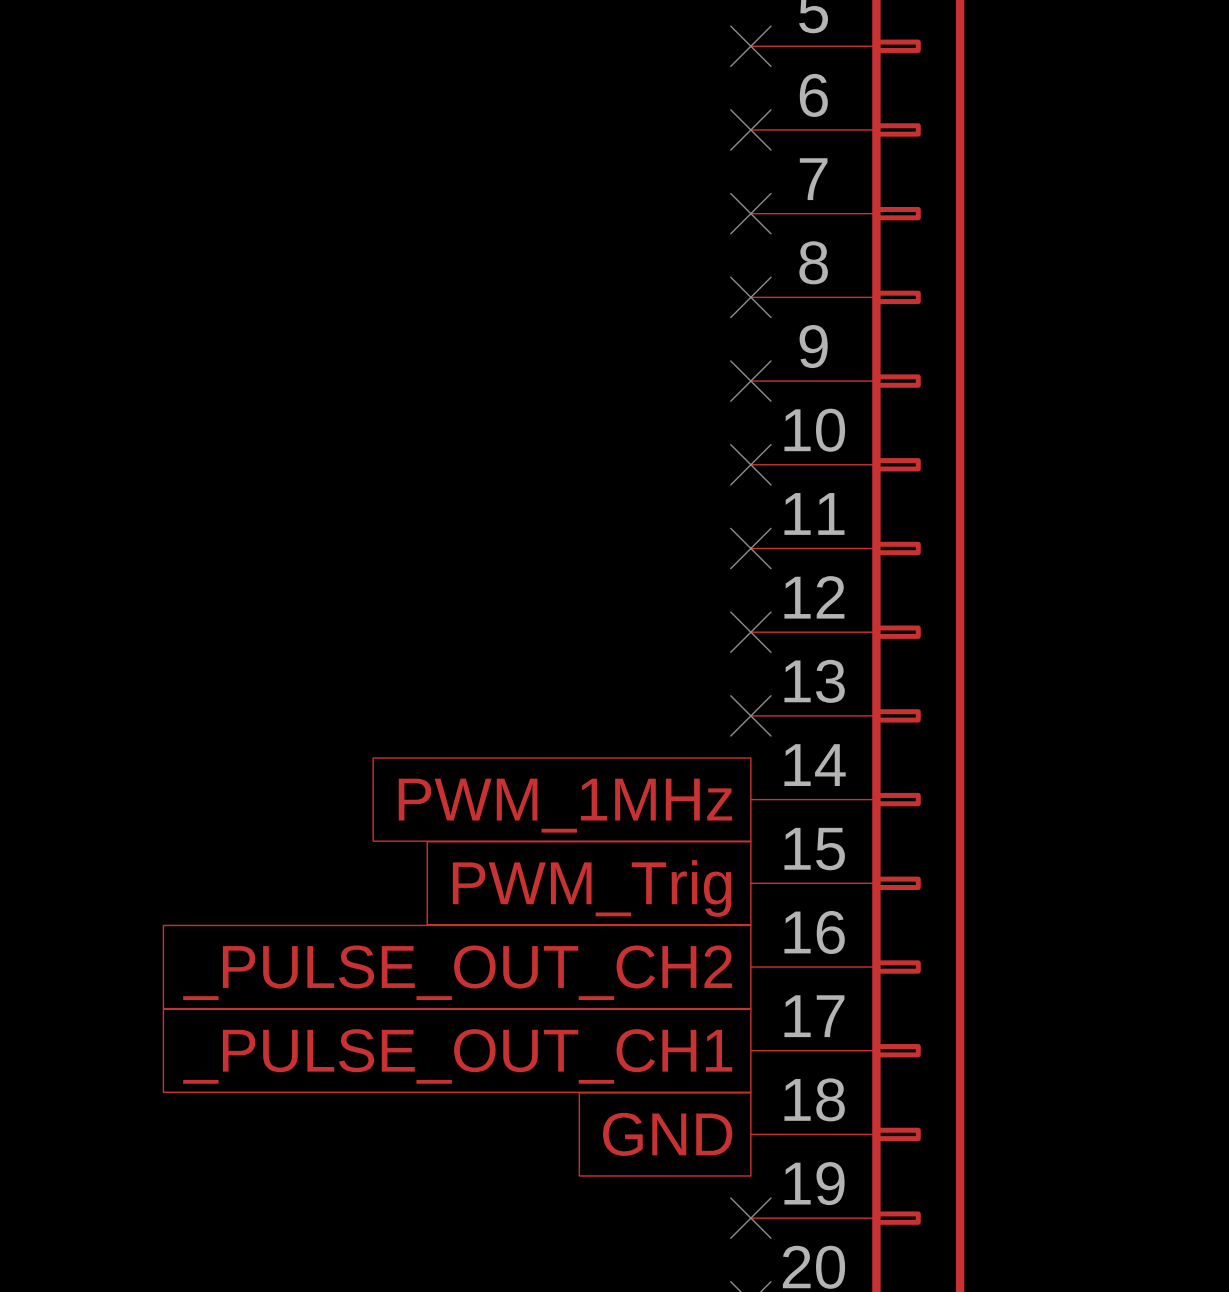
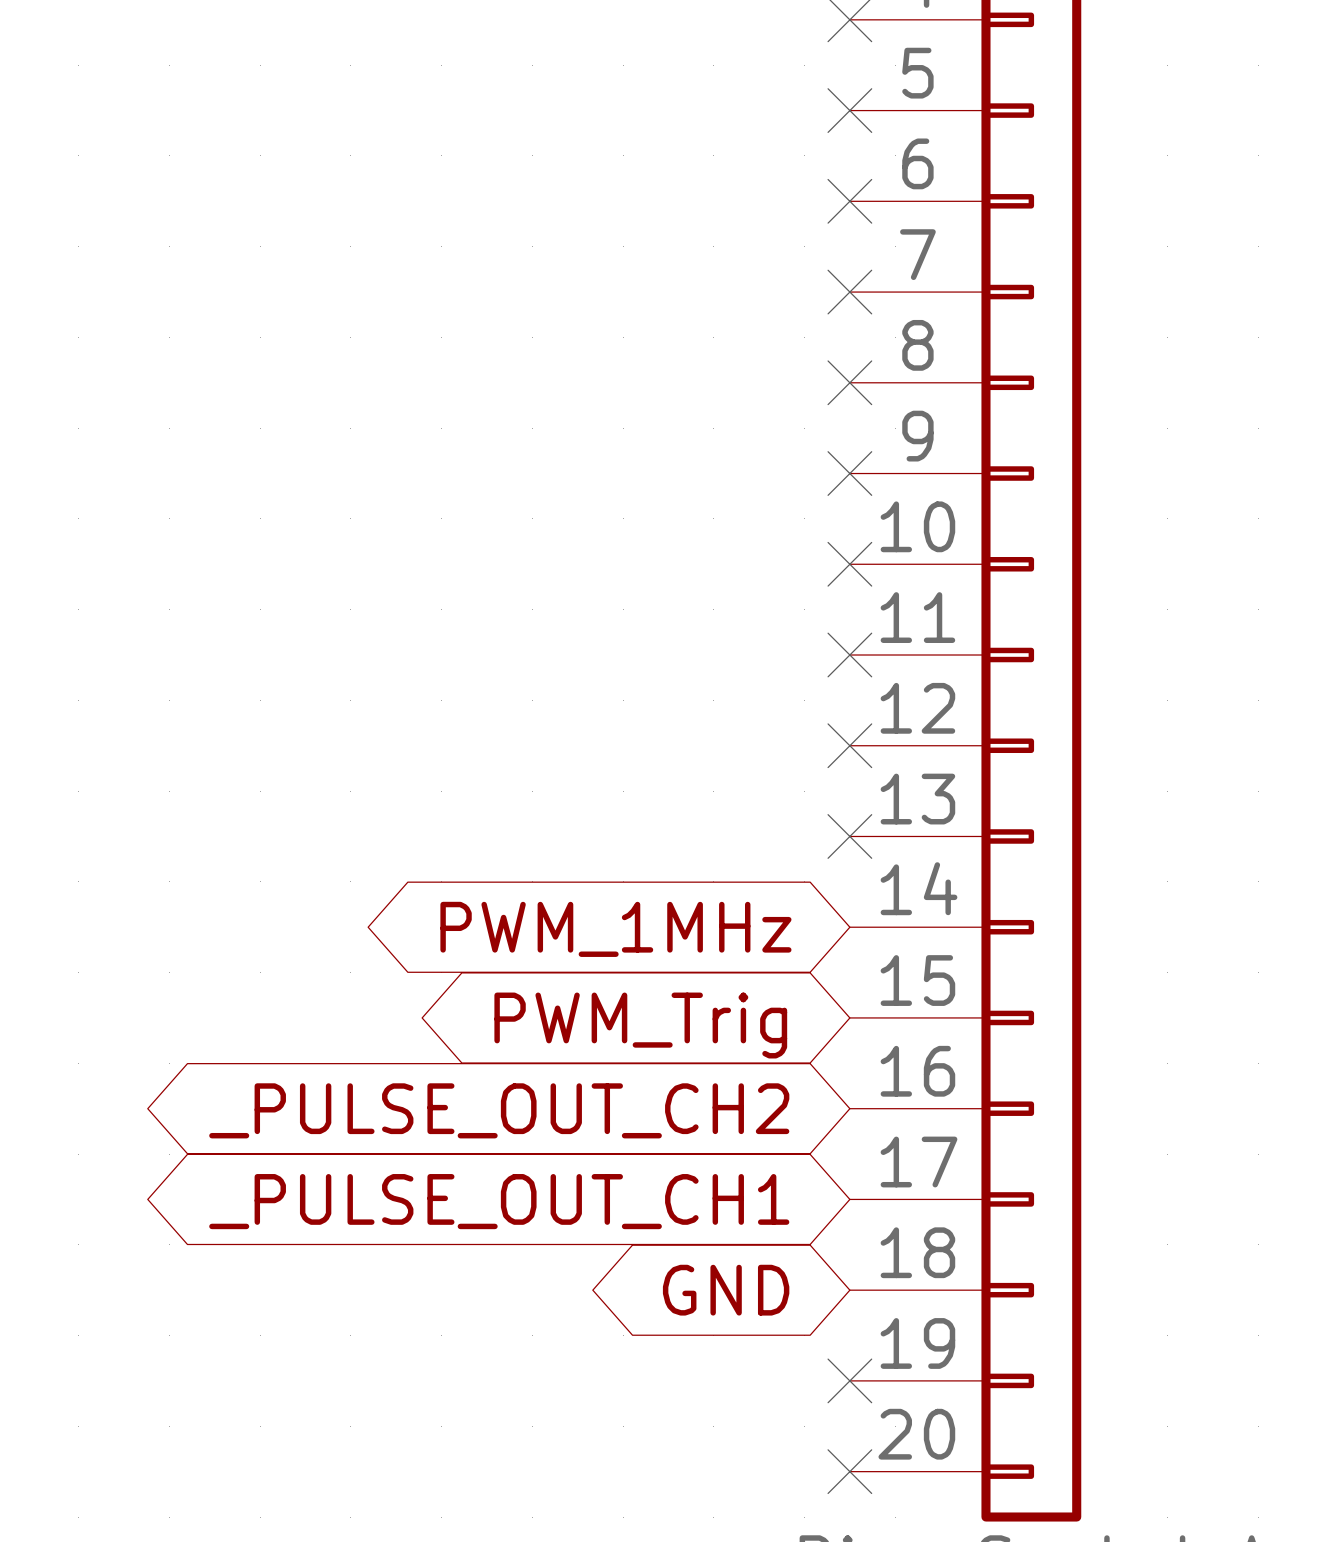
global label shape: passive (565, 805) -> bidirectional (615, 929)
global label shape: passive (592, 888) -> bidirectional (640, 1025)
global label shape: passive (457, 972) -> bidirectional (499, 1110)
global label shape: passive (457, 1056) -> bidirectional (499, 1201)
global label shape: passive (667, 1134) -> bidirectional (726, 1290)

